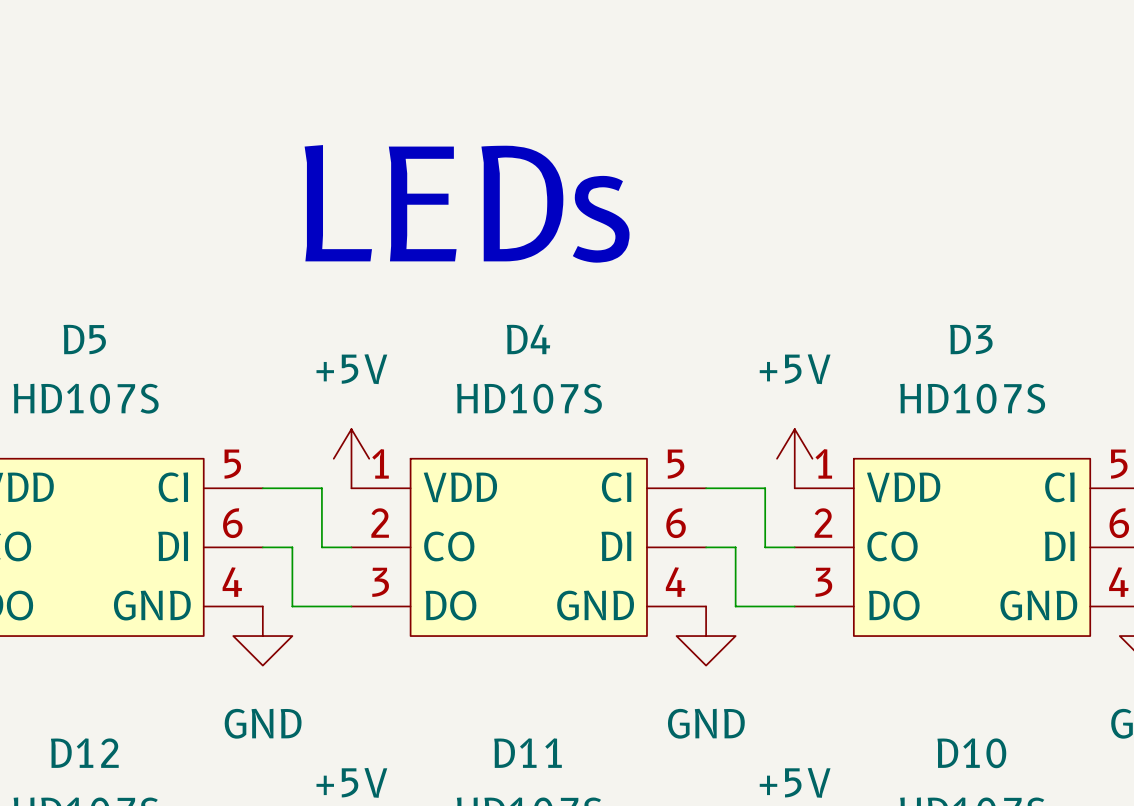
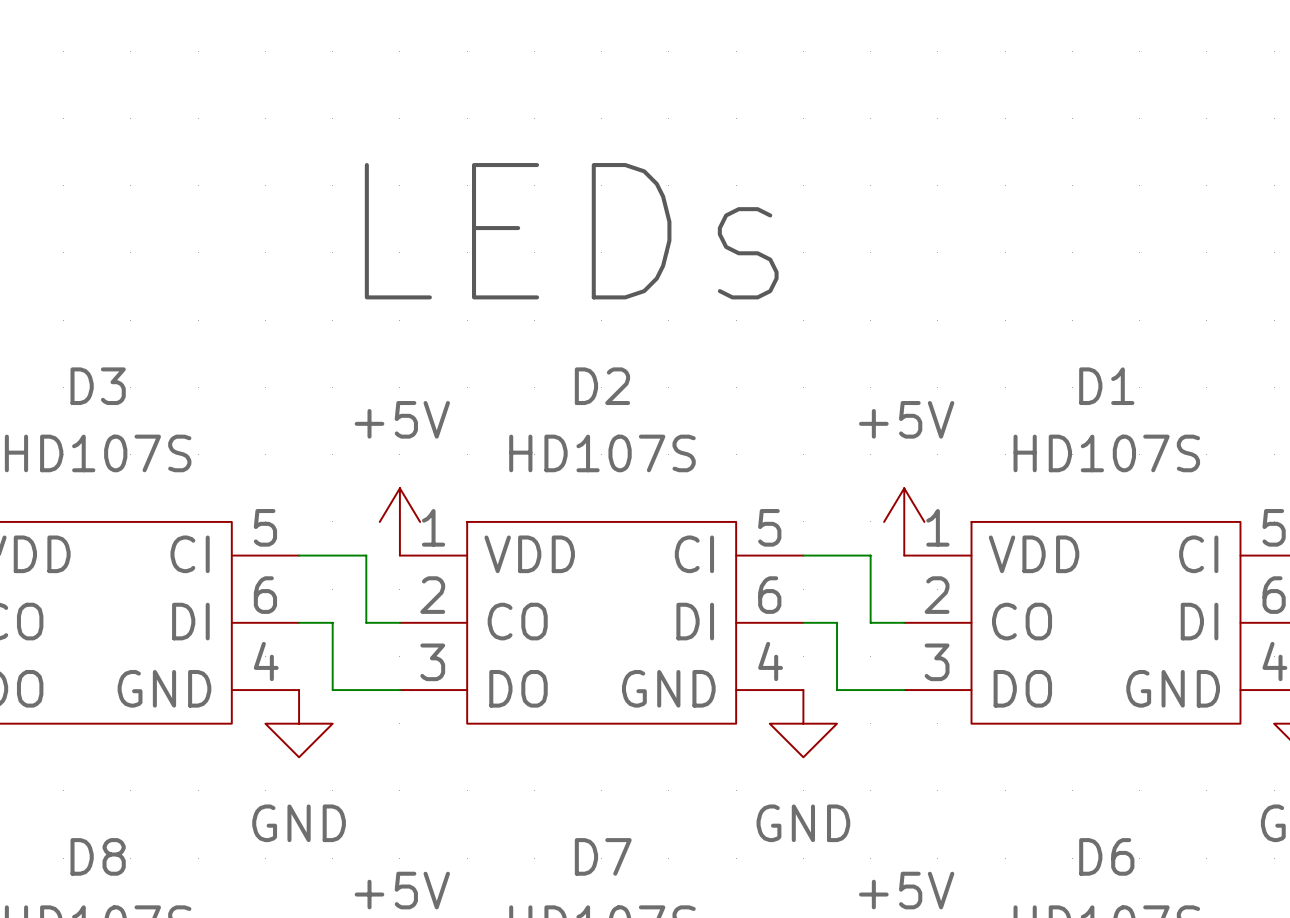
D5 name: D5 (84, 339) -> D3 (98, 386)
D4 name: D4 (528, 339) -> D2 (602, 386)
D3 name: D3 (971, 339) -> D1 (1106, 386)
D12 name: D12 (84, 753) -> D8 (98, 856)
D11 name: D11 (528, 753) -> D7 (603, 856)
D10 name: D10 (971, 753) -> D6 (1106, 856)

